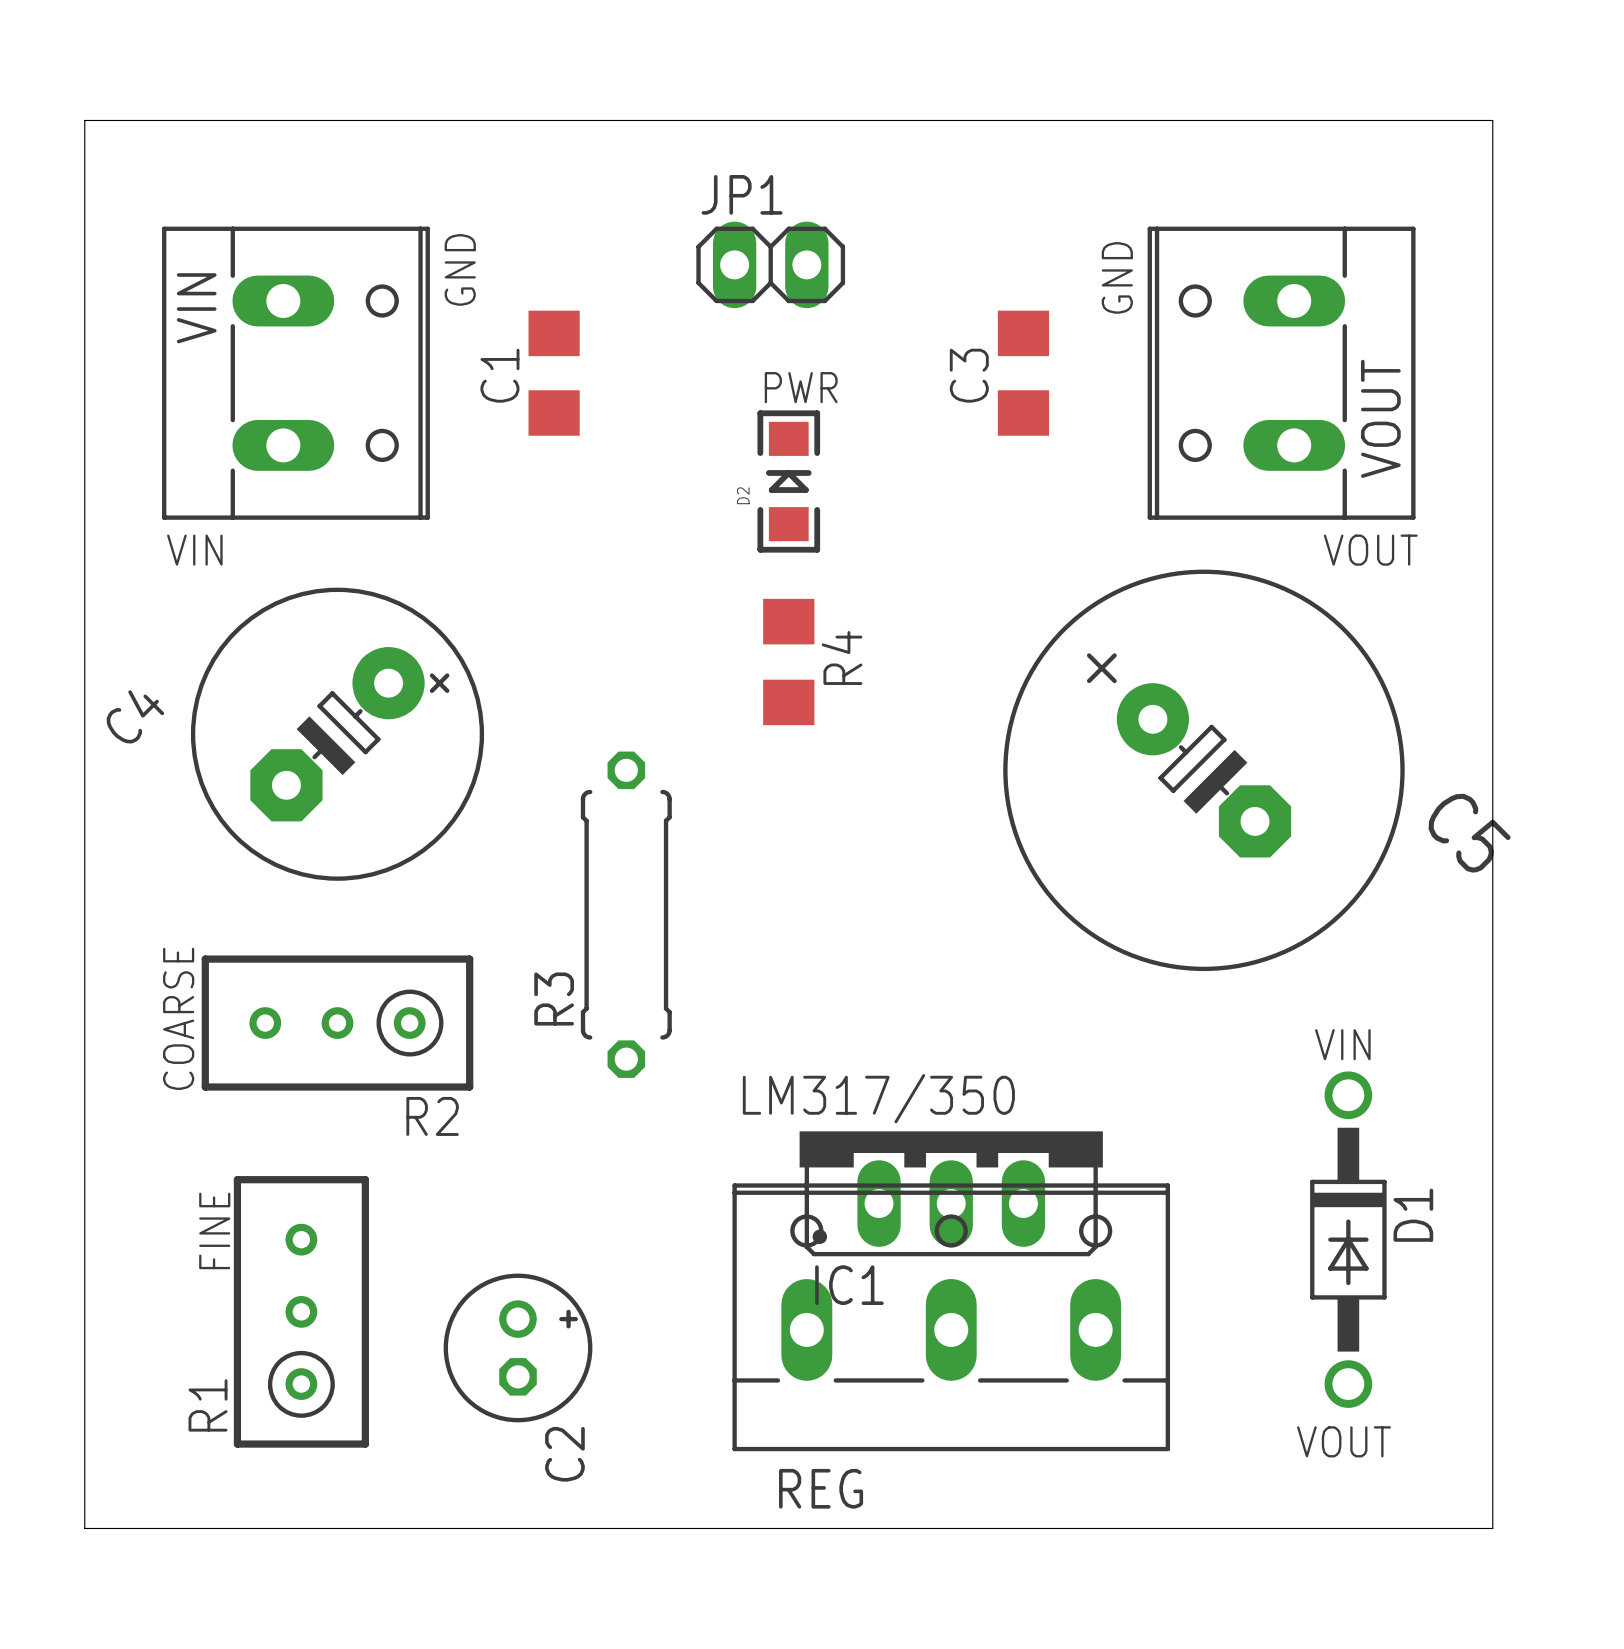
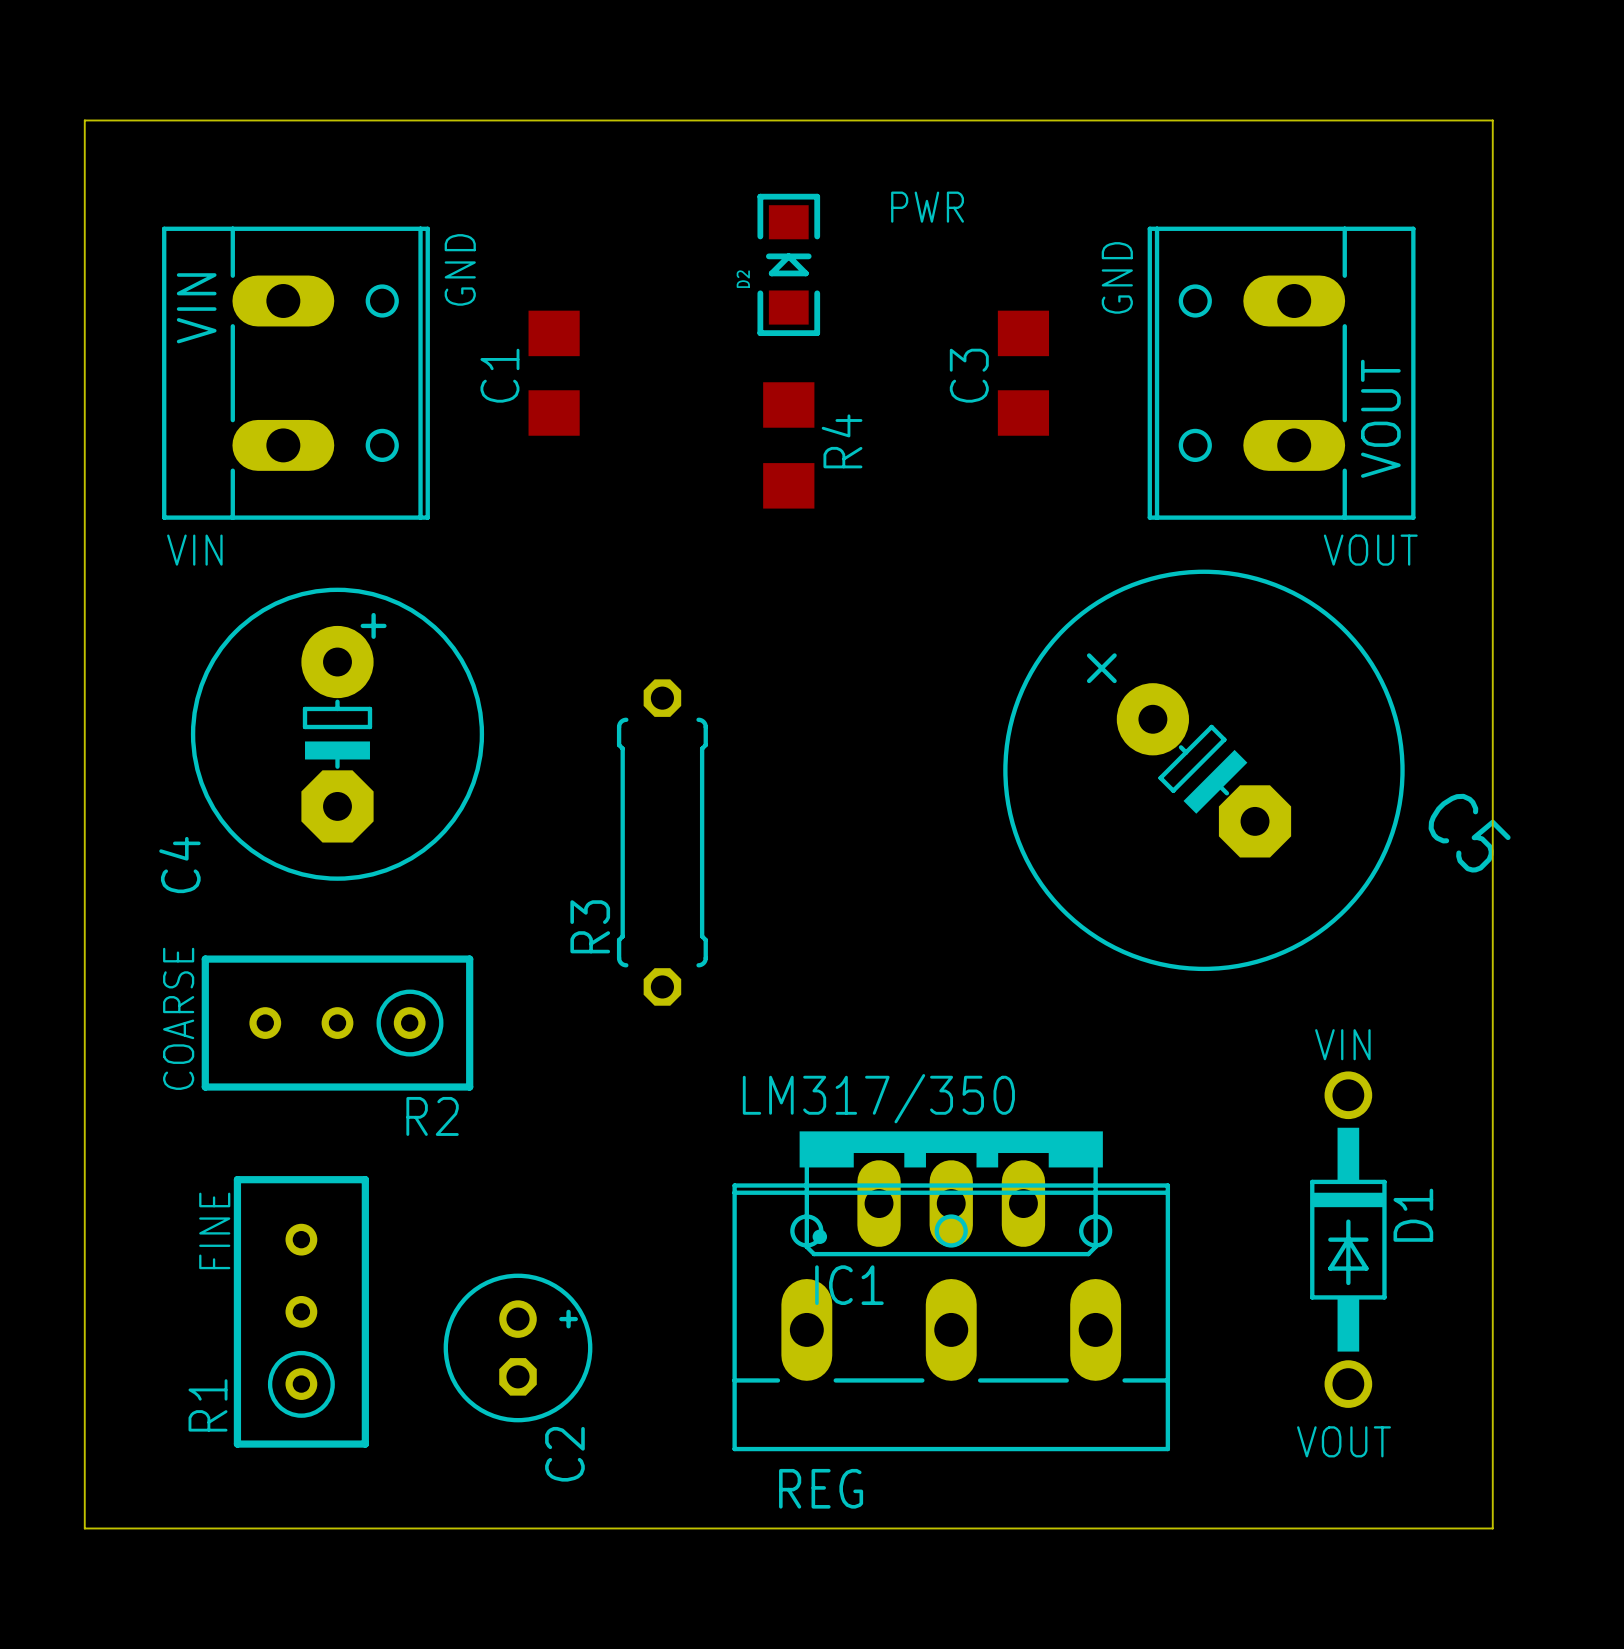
JP1: (770, 264) -> none
text position: PWR (801, 387) -> PWR (927, 207)
D2 position: (788, 481) -> (788, 264)
R4 position: (788, 662) -> (788, 445)
C4 rotation: 0° (337, 734) -> 45° counterclockwise (337, 734)
R3 position: (626, 914) -> (662, 842)

